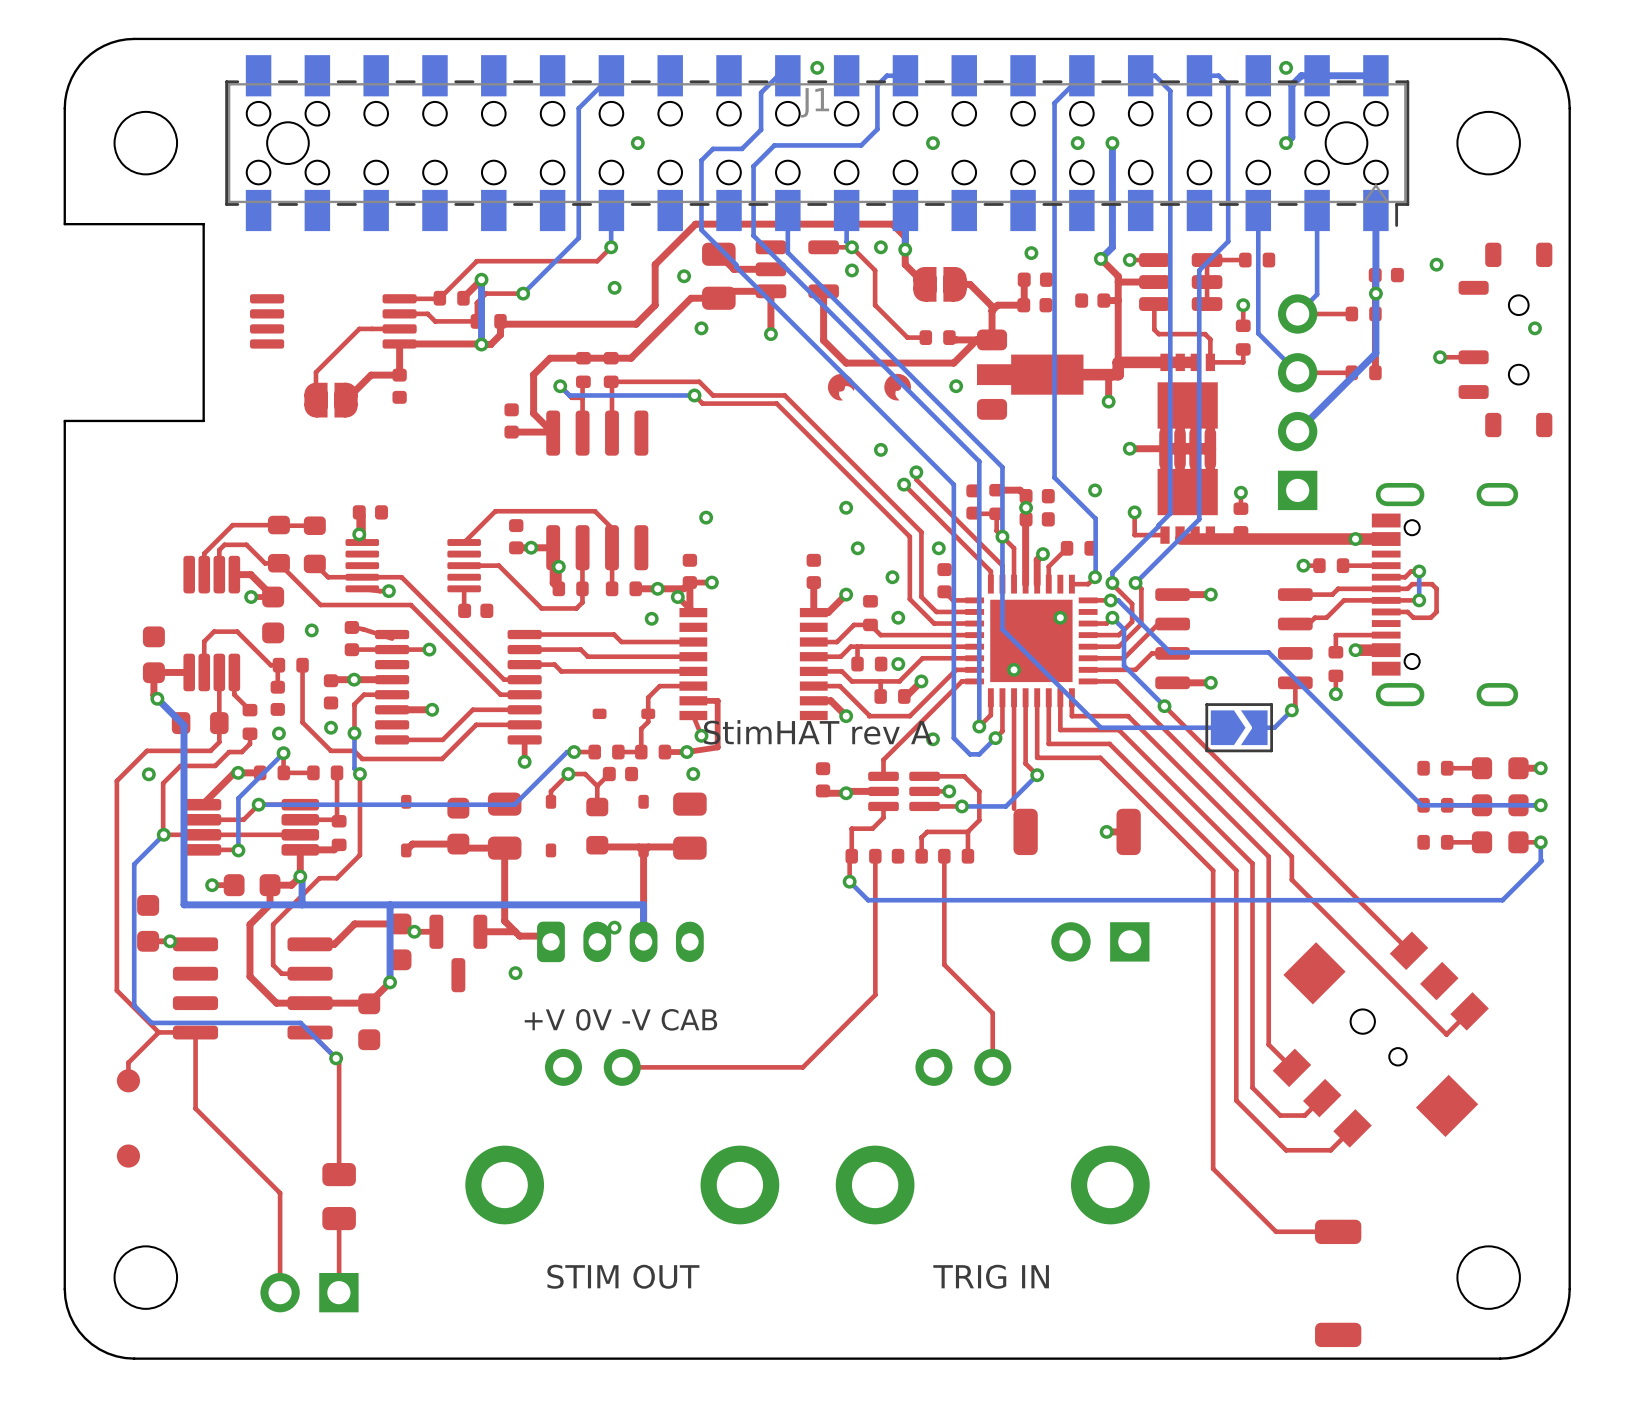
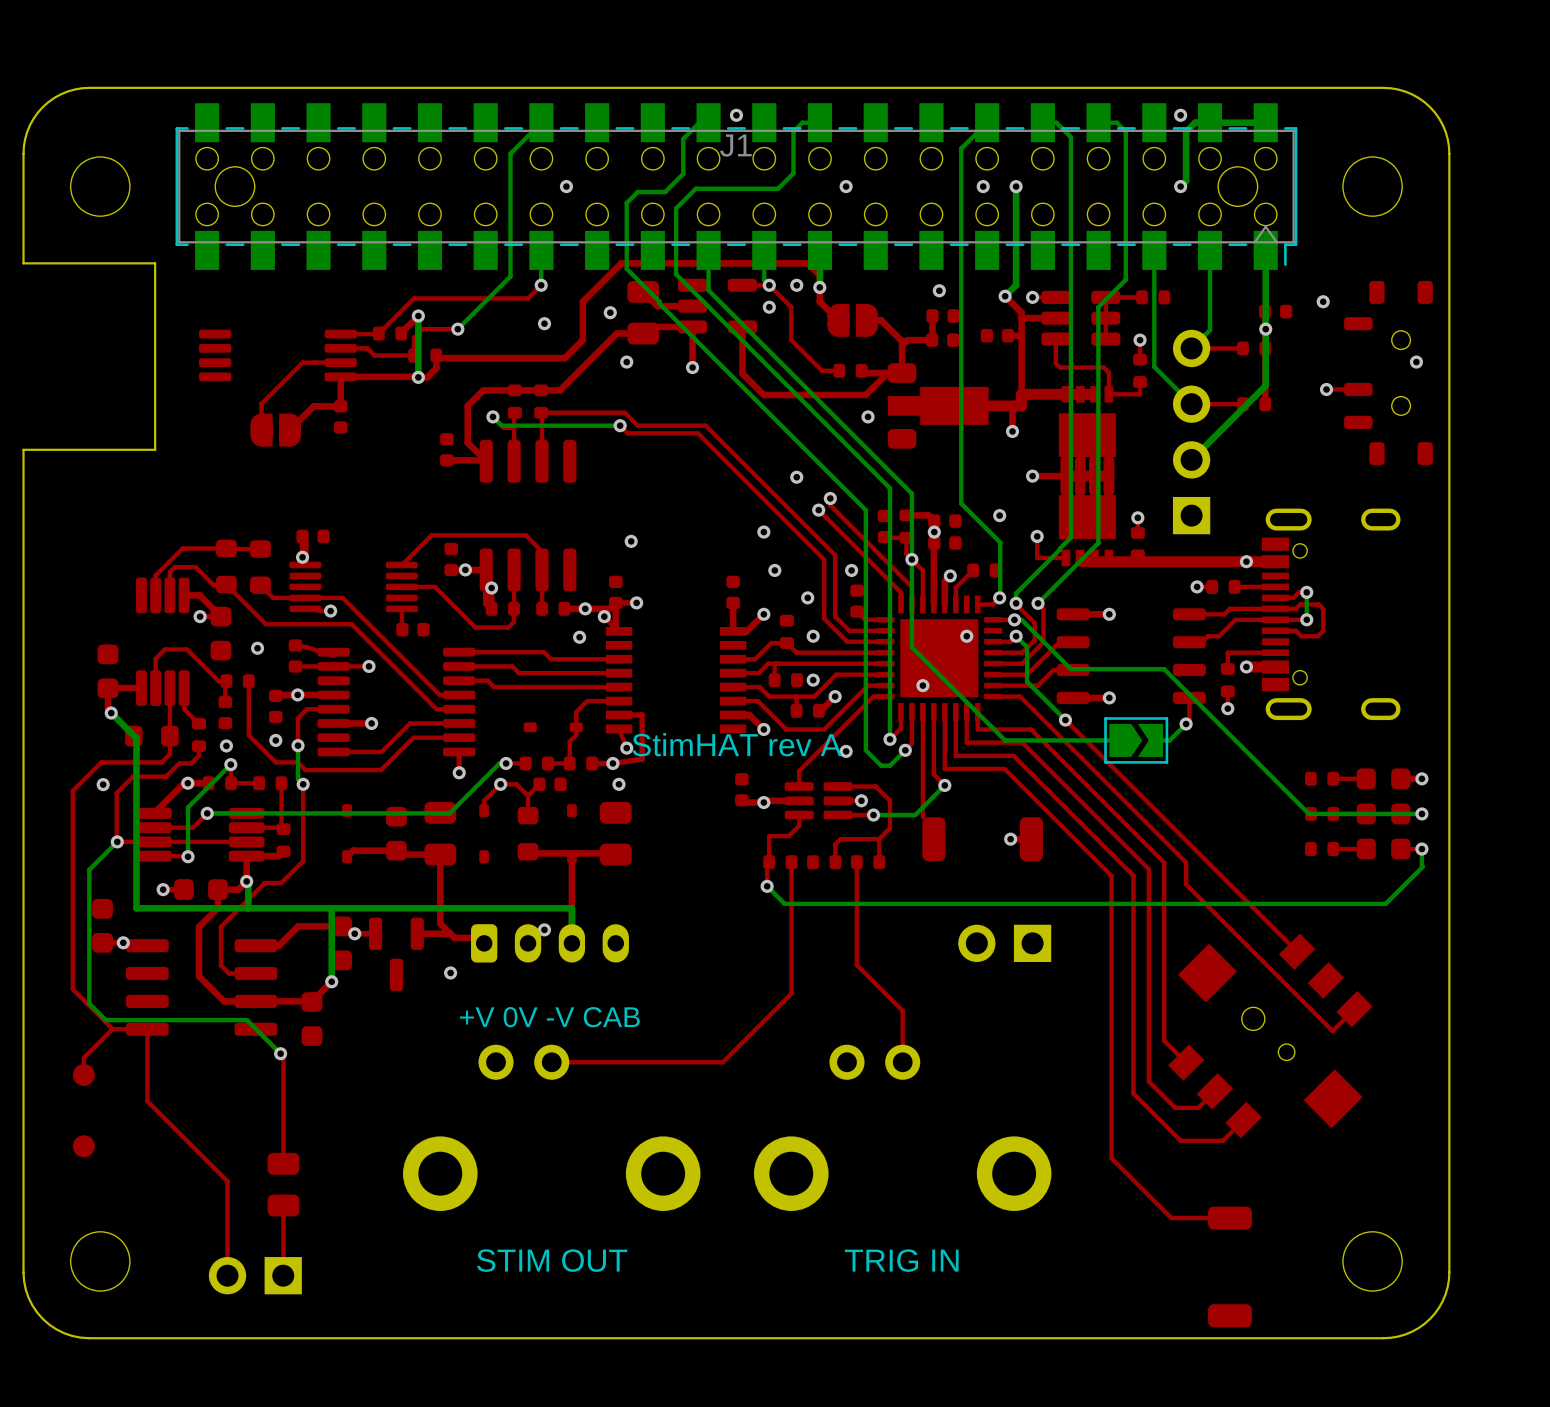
part: (869, 387) -> none

